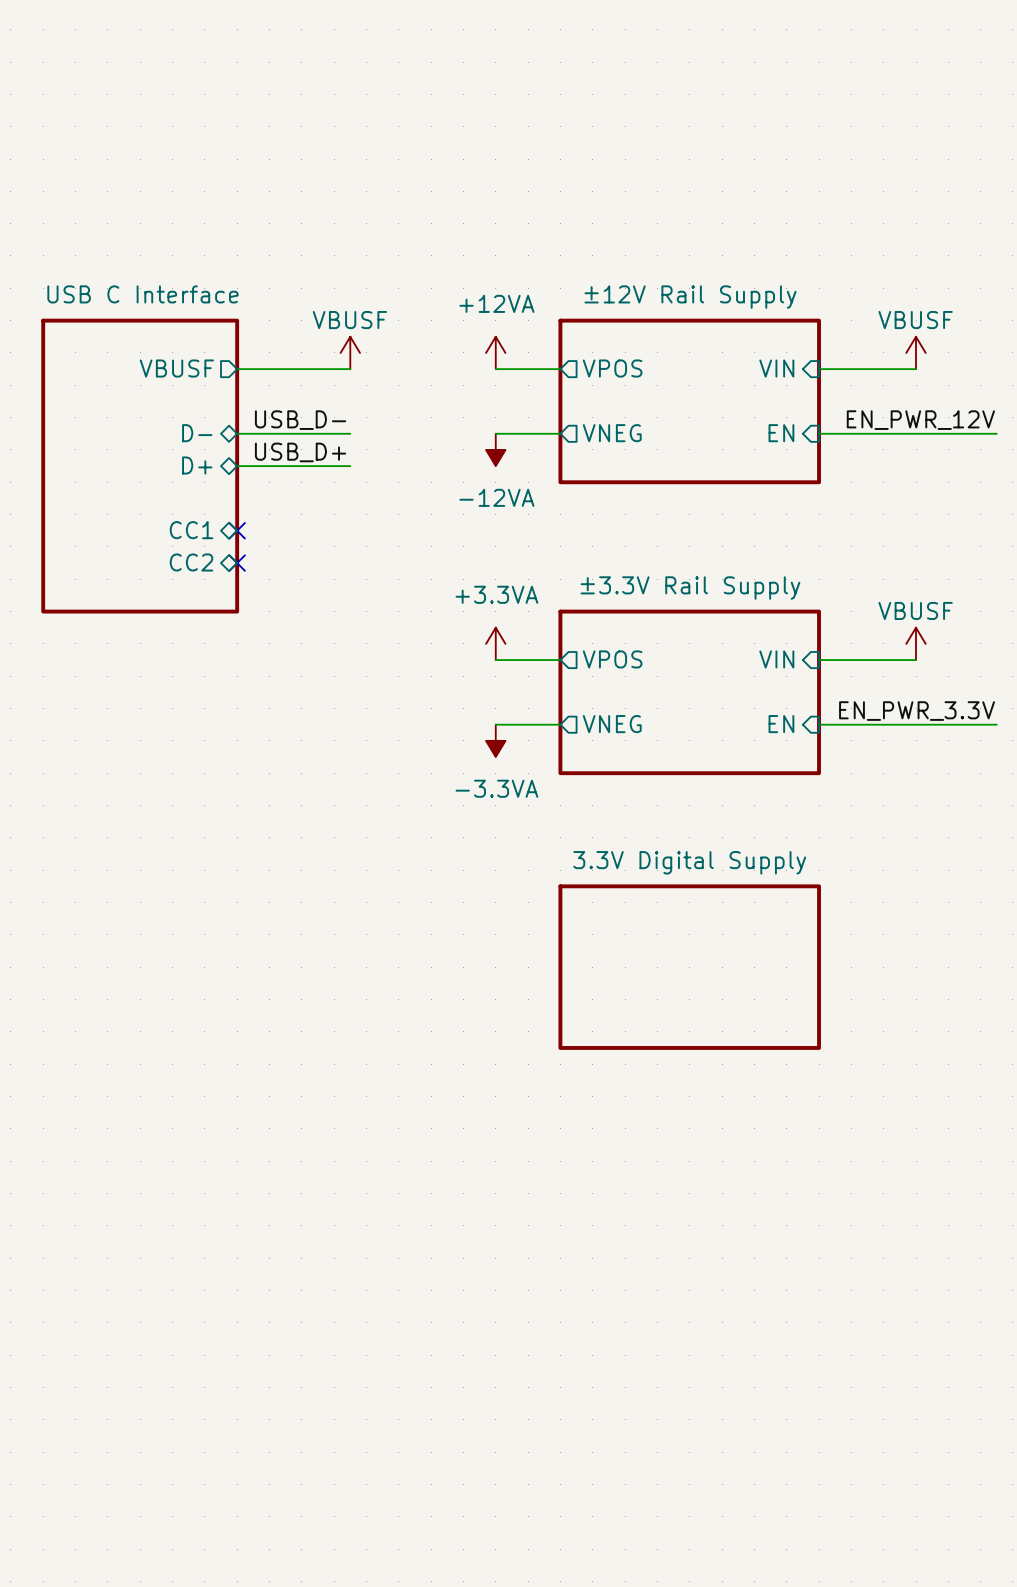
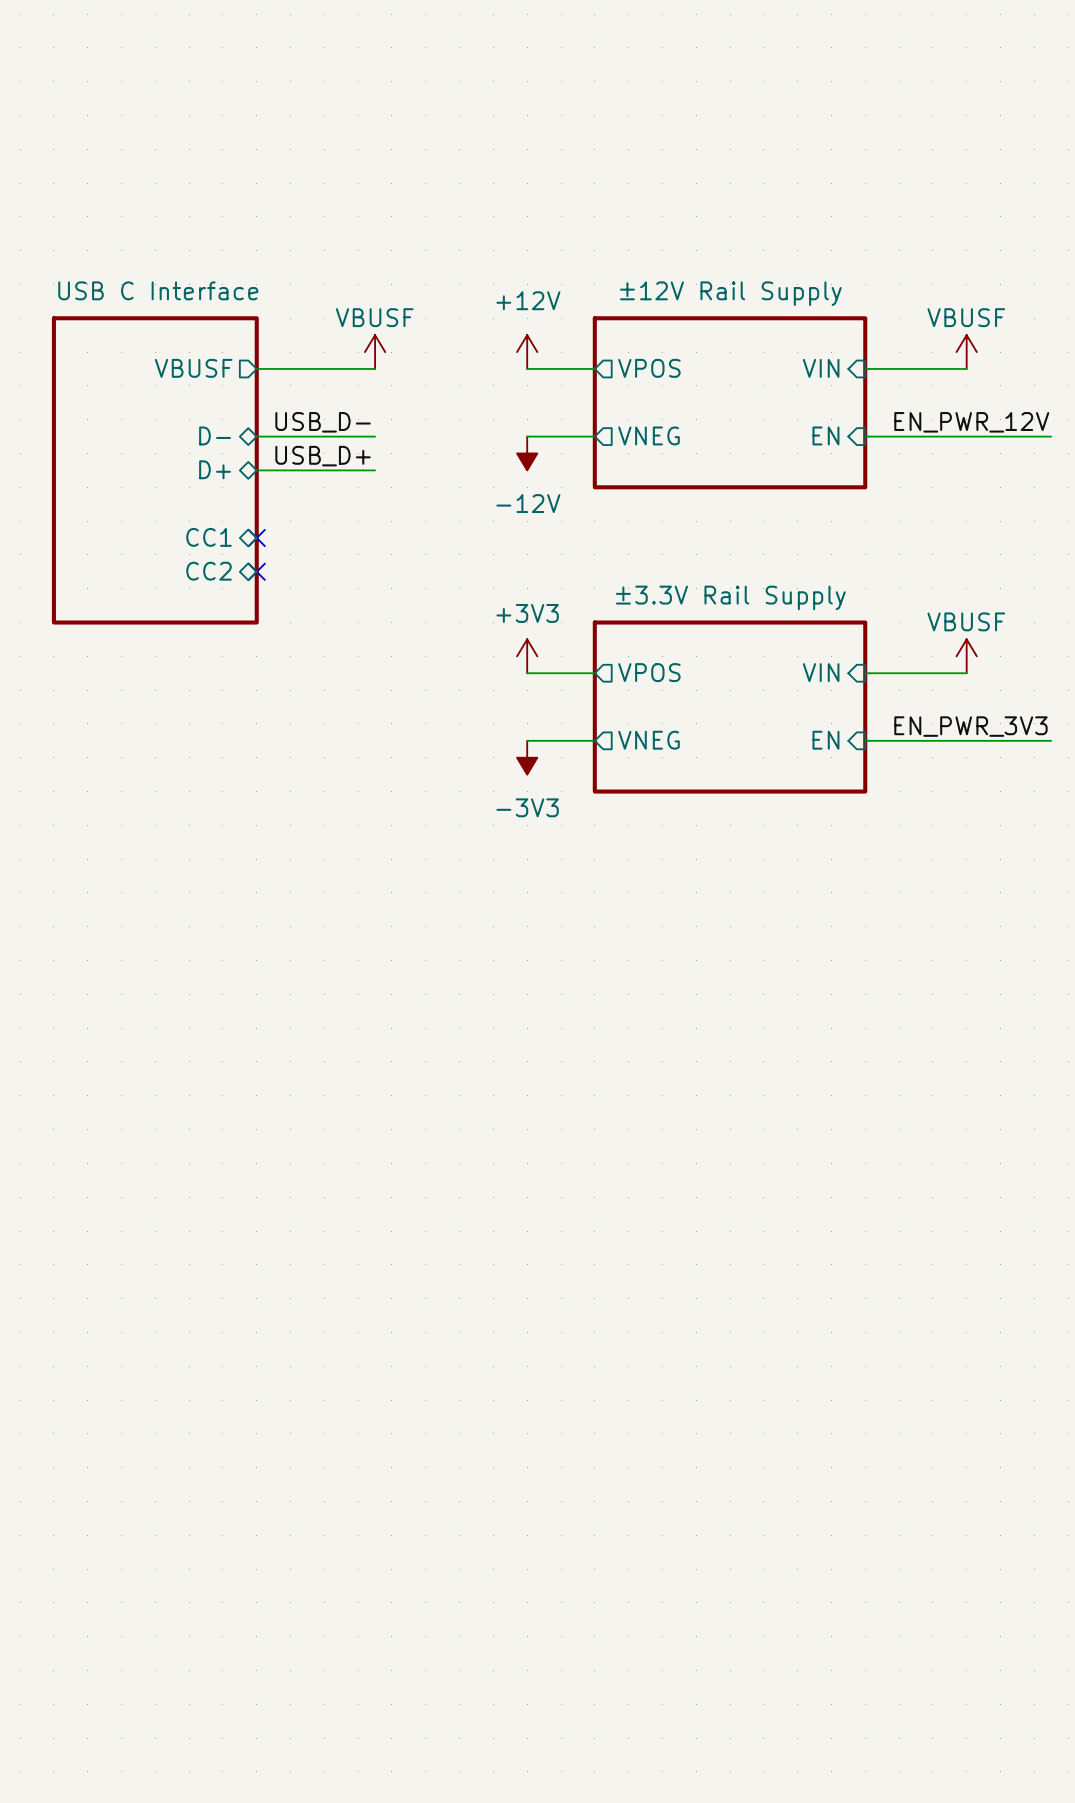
power symbol: +12VA (495, 352) -> +12V (527, 352)
power symbol: -12VA (495, 449) -> -12V (527, 453)
power symbol: +3.3VA (495, 643) -> +3V3 (527, 656)
label: EN_PWR_3.3V (917, 711) -> EN_PWR_3V3 (970, 726)
power symbol: -3.3VA (495, 740) -> -3V3 (527, 757)
sheet 3.3V Digital Supply: (689, 967) -> none

